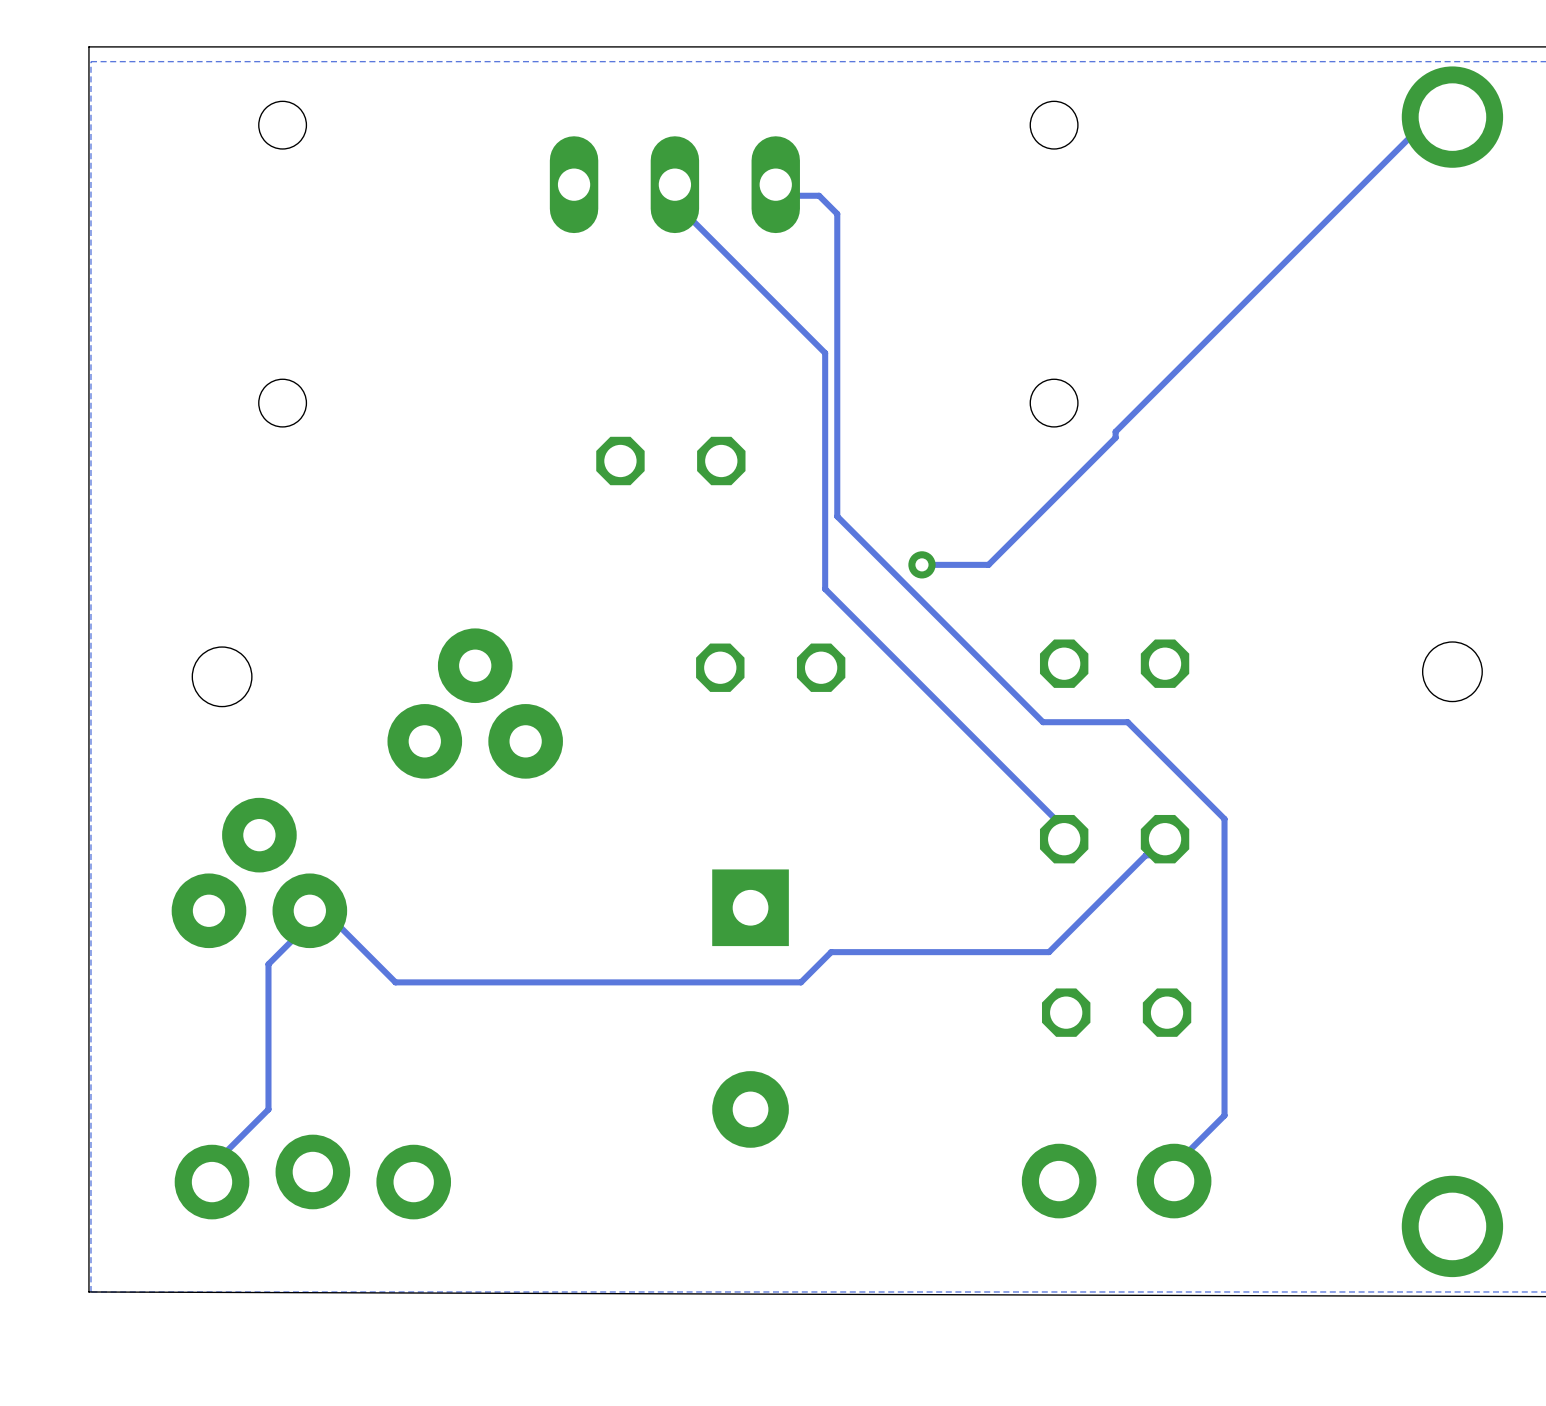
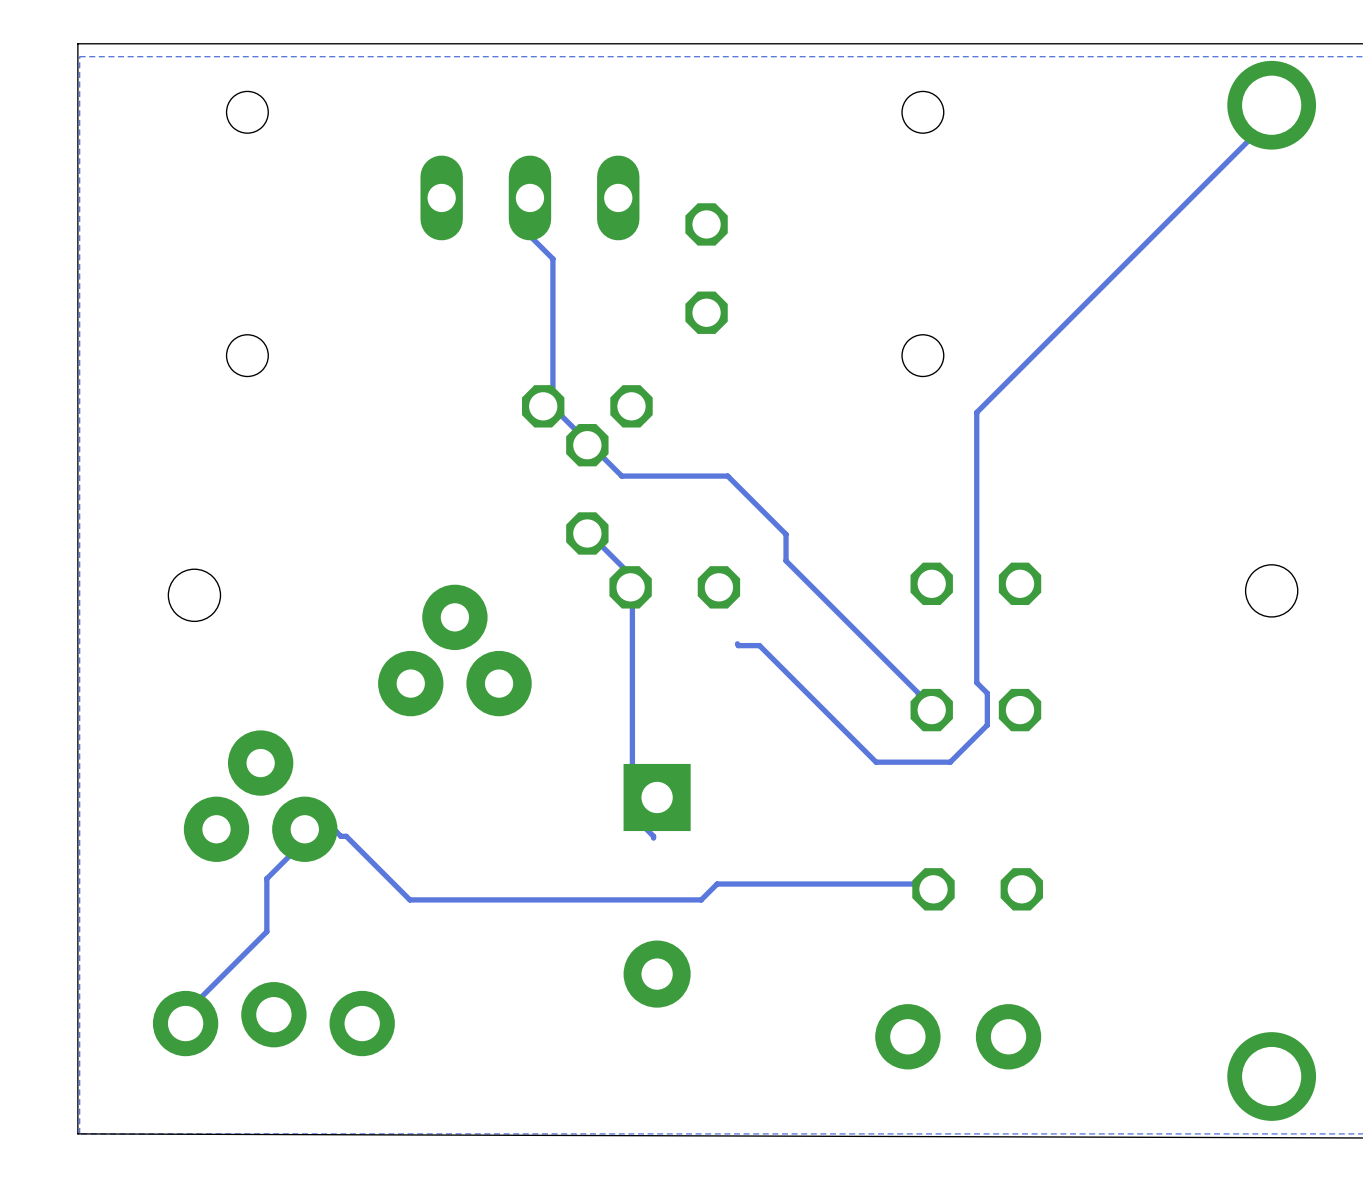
track: (1448, 117) (1430, 117) (1115, 431) (1115, 437) (988, 564) (921, 564) -> (1268, 105) (1268, 121) (976, 412) (976, 682) (987, 693) (987, 725) (950, 762) (876, 762) (759, 645) (738, 645) (737, 643)
track: (674, 184) (679, 189) (679, 207) (825, 353) (825, 589) (1061, 825) (1061, 837) (1064, 839) -> none
part position: (674, 184) -> (529, 197)
track: (775, 184) (776, 189) (782, 195) (819, 195) (837, 213) (837, 516) (1043, 722) (1127, 722) (1224, 819) (1224, 1115) (1176, 1163) (1174, 1181) -> none
track: none -> (529, 197) (531, 200) (531, 237) (552, 258) (552, 407) (621, 476) (727, 476) (786, 534) (786, 560) (918, 693) (918, 698) (931, 710)
part: none -> (706, 268)
part: none -> (587, 489)
via: (921, 564) -> none
track: none -> (587, 533) (632, 576) (632, 815) (653, 838)
part position: (475, 703) -> (454, 650)
part position: (1114, 839) -> (975, 710)
track: (1165, 839) (1164, 843) (1151, 855) (1145, 855) (1049, 952) (831, 952) (800, 982) (395, 982) (328, 915) (310, 915) (309, 910) (304, 915) (304, 927) (268, 964) (268, 1109) (214, 1163) (214, 1182) (212, 1182) -> none
part position: (259, 872) -> (260, 796)
track: none -> (931, 886) (929, 884) (717, 884) (701, 899) (409, 899) (346, 836) (341, 836) (335, 831) (309, 831) (304, 829) (303, 841) (266, 878) (266, 931) (187, 1011) (185, 1023)
part position: (312, 1177) -> (273, 1019)
part position: (1116, 1181) -> (958, 1036)

